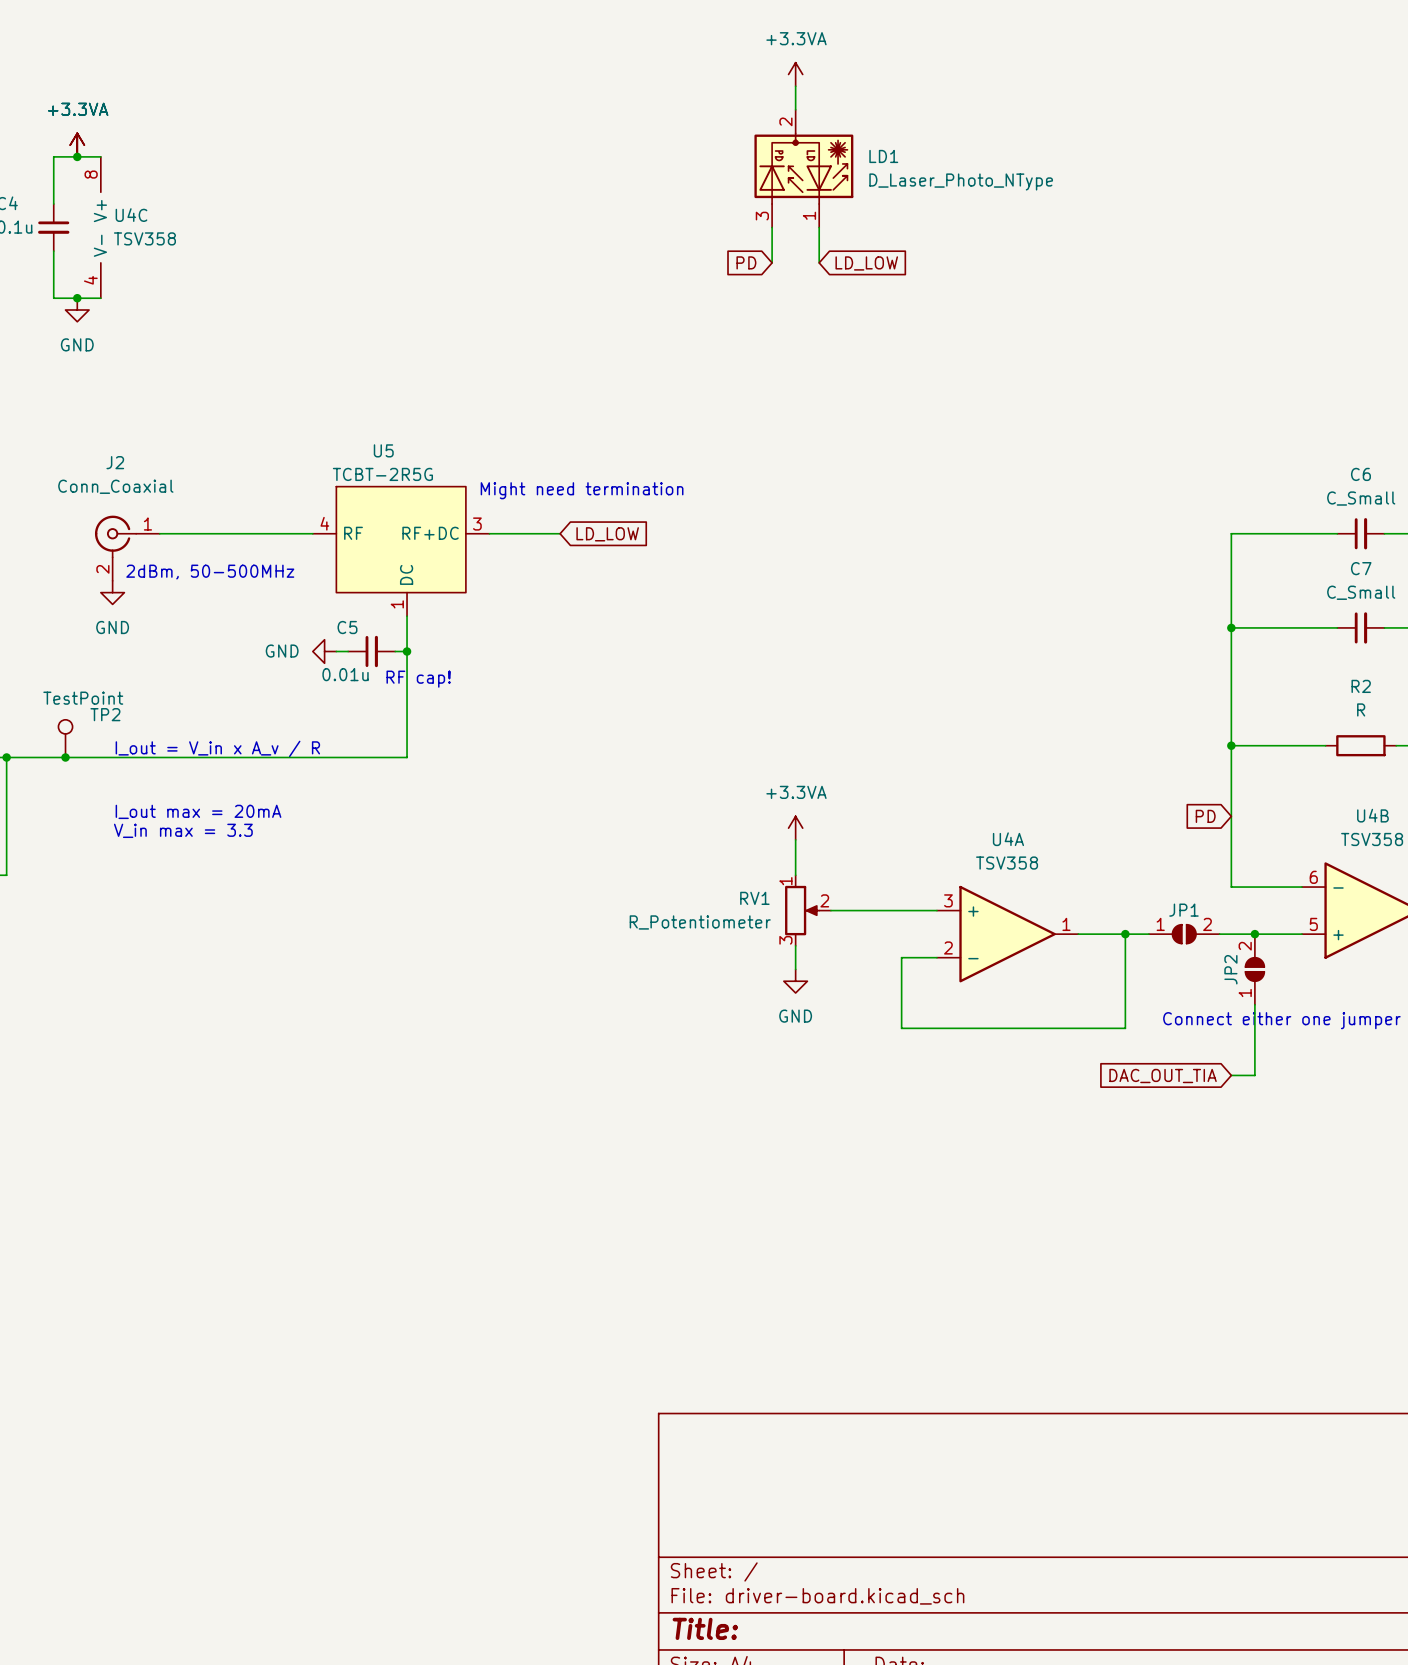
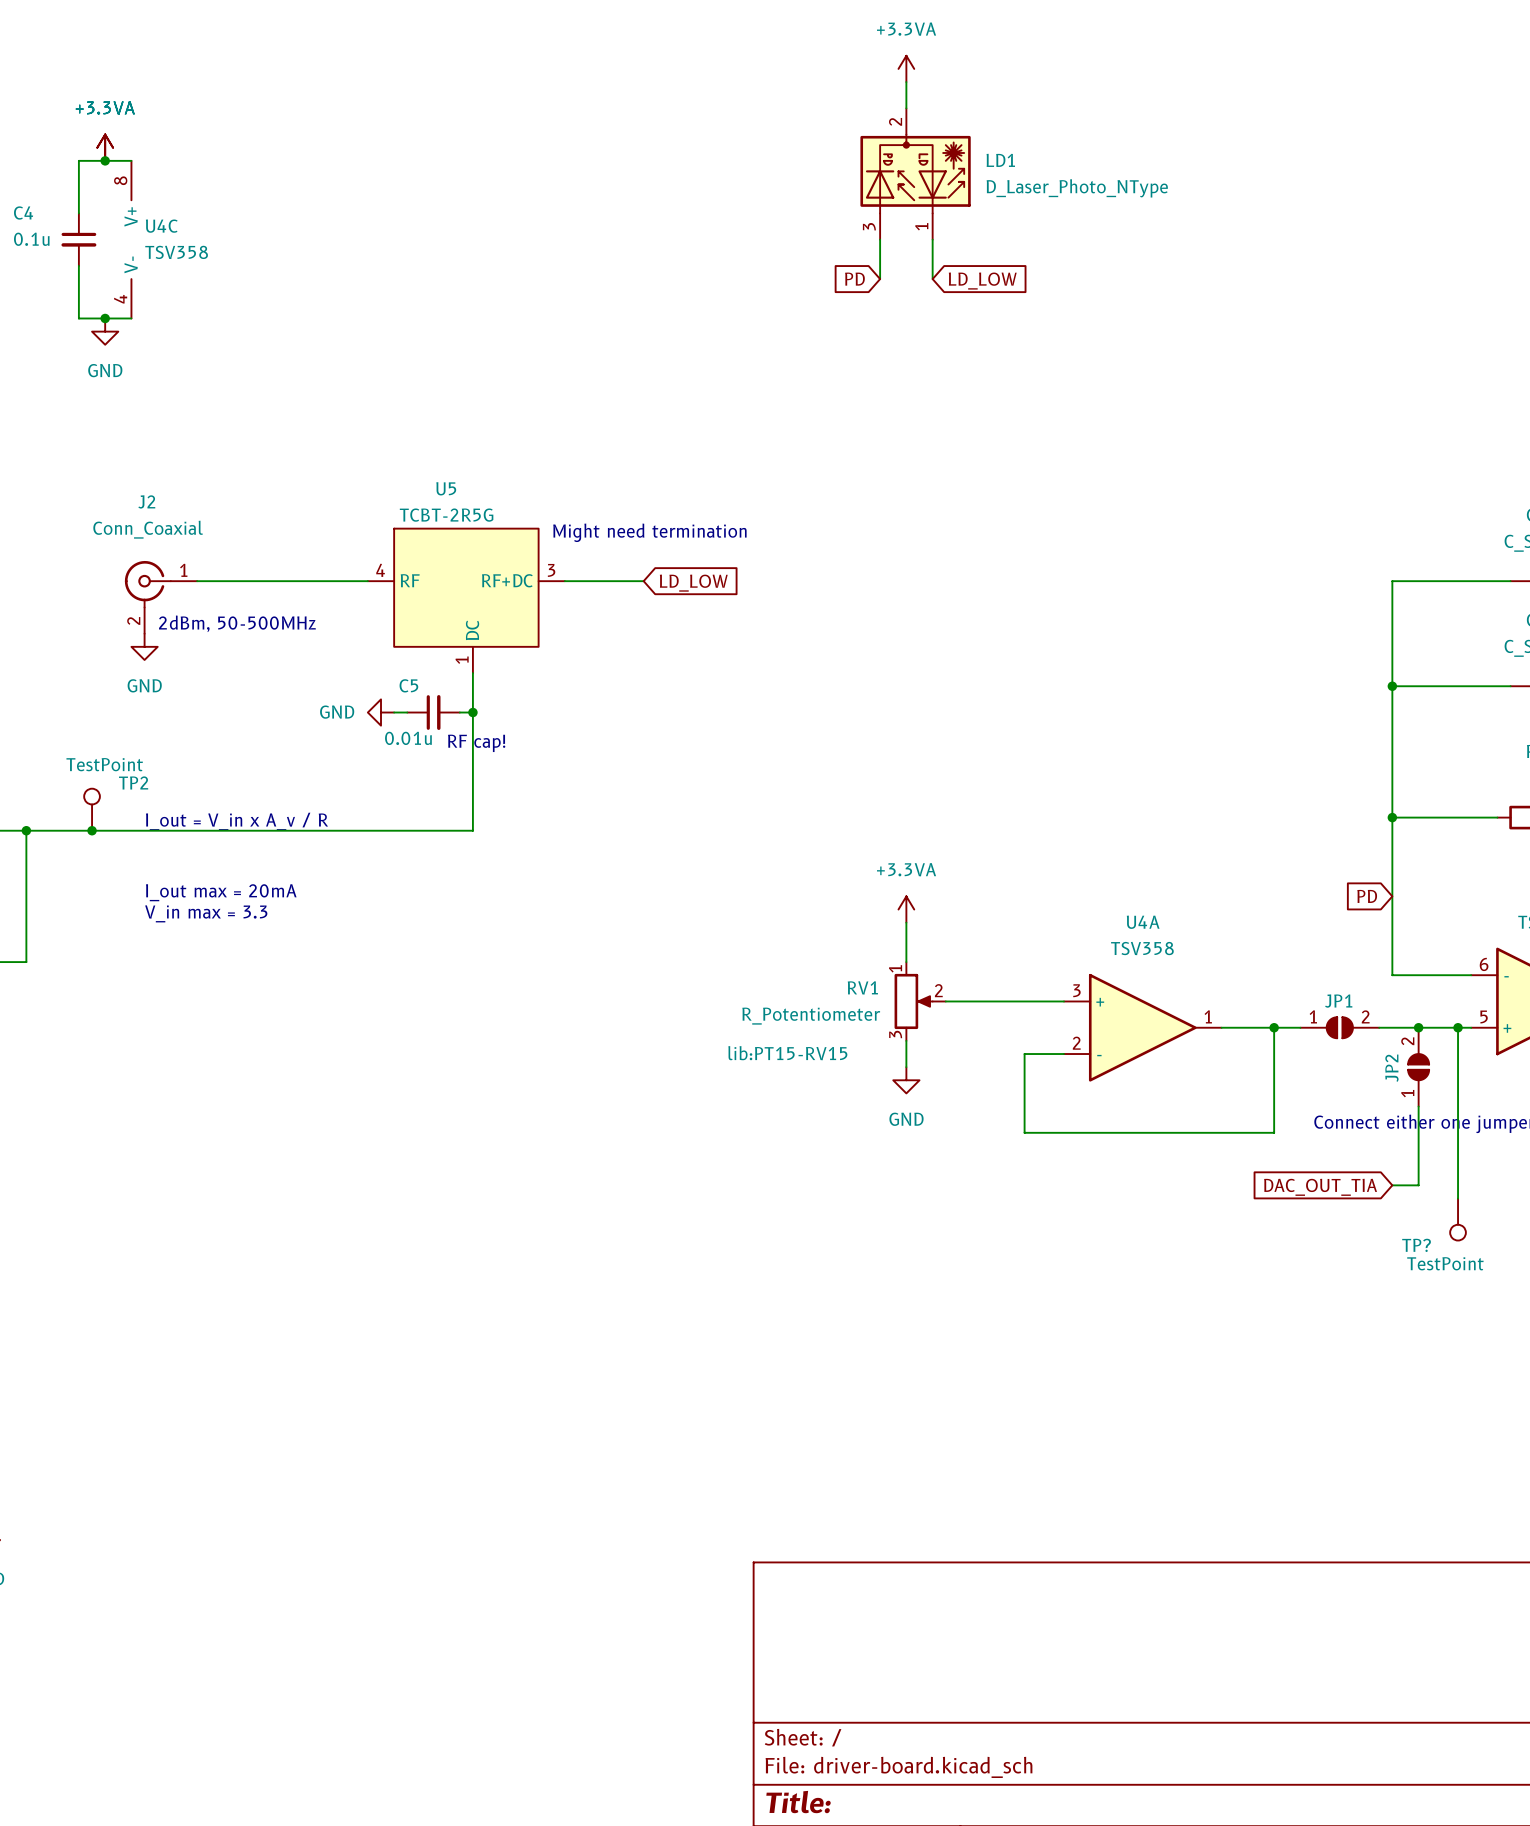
wire: none -> (1458, 1027) (1458, 1198)
junction: none -> (1458, 1027)
RV1 text: none -> lib:PT15-RV15 (787, 1053)
TP?: none -> TestPoint (1458, 1219)

